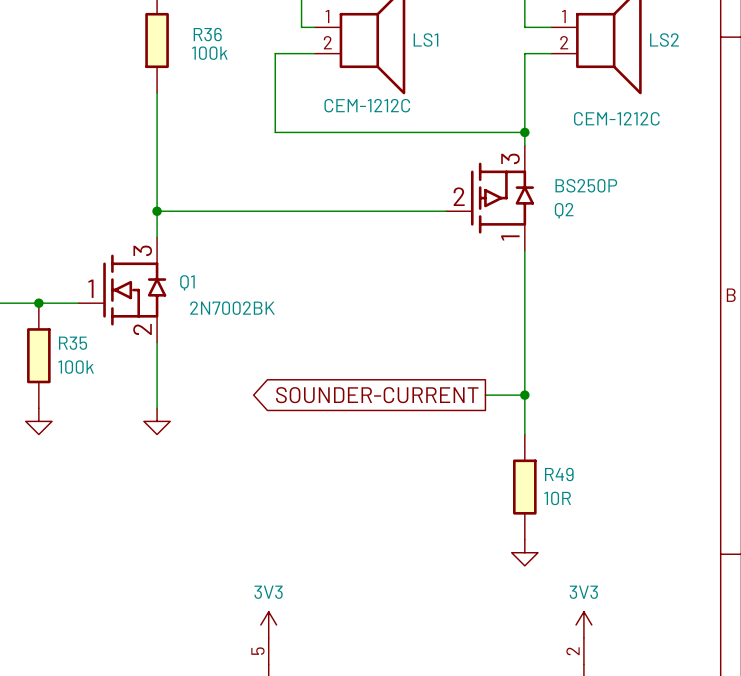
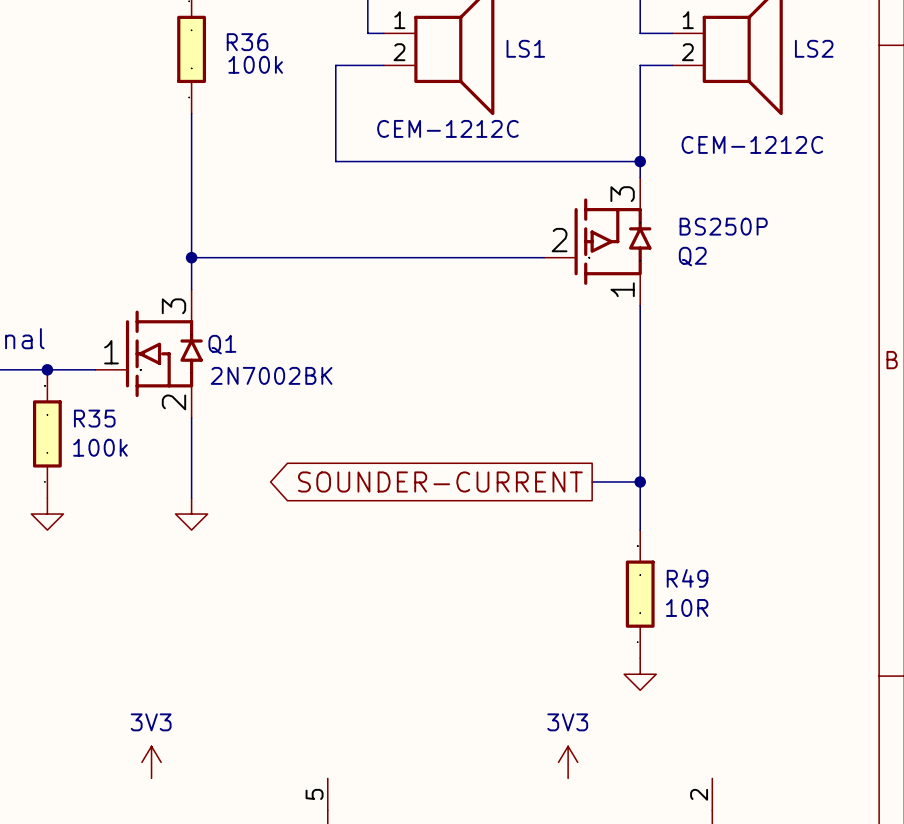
power symbol: none -> 3V3 (151, 762)
power symbol: 3V3 (268, 624) -> none
power symbol: none -> 3V3 (568, 762)
power symbol: 3V3 (583, 624) -> none

